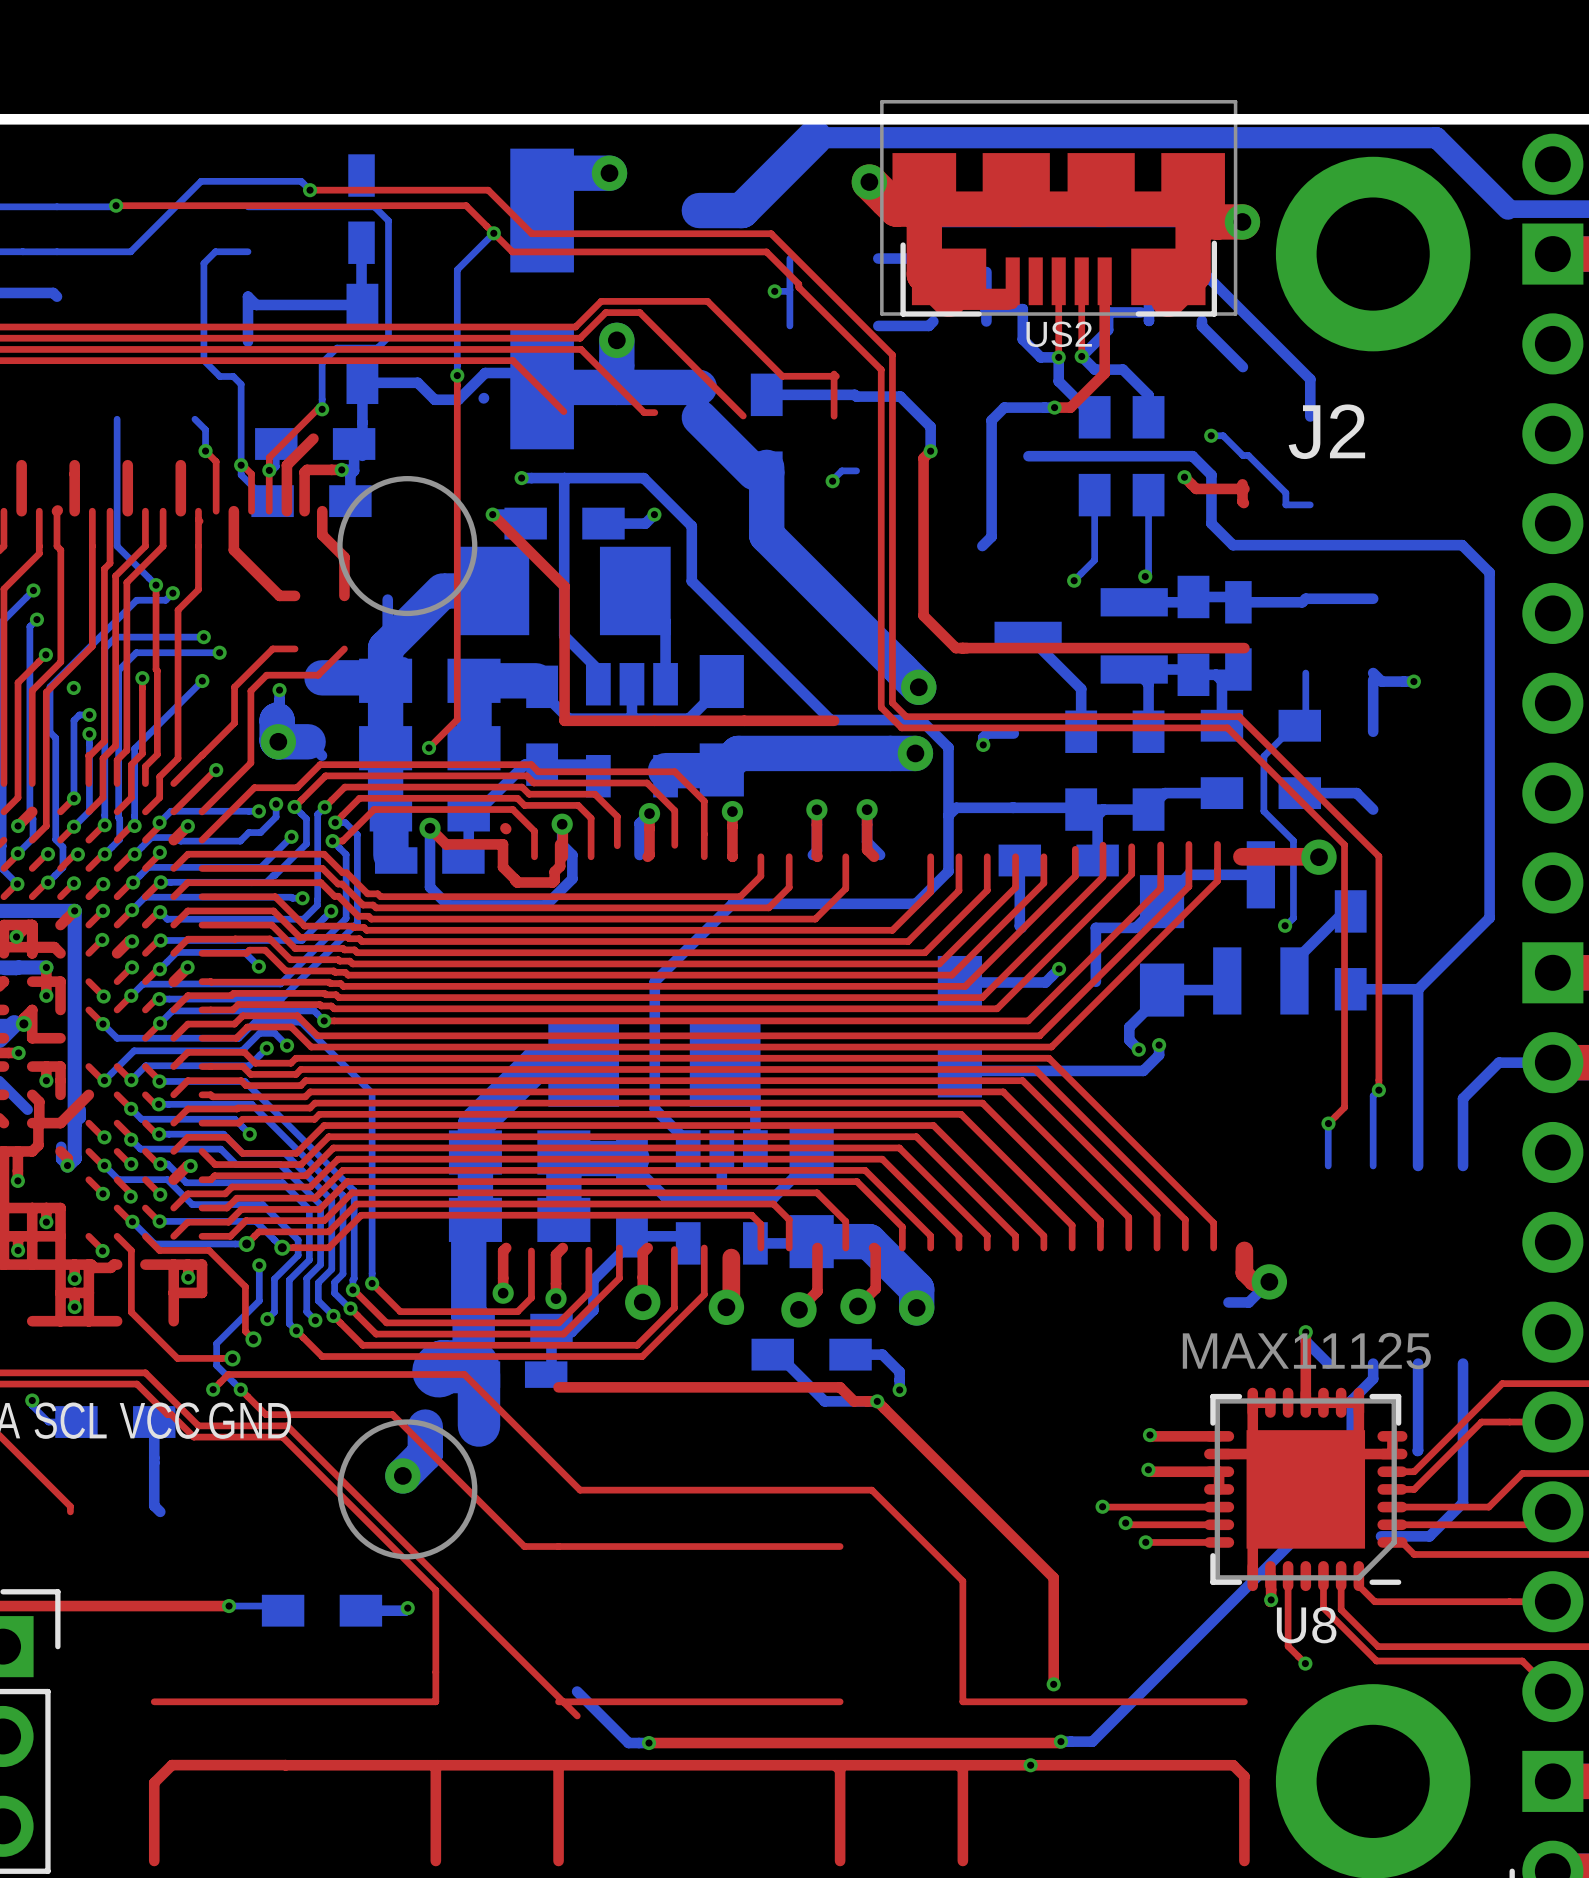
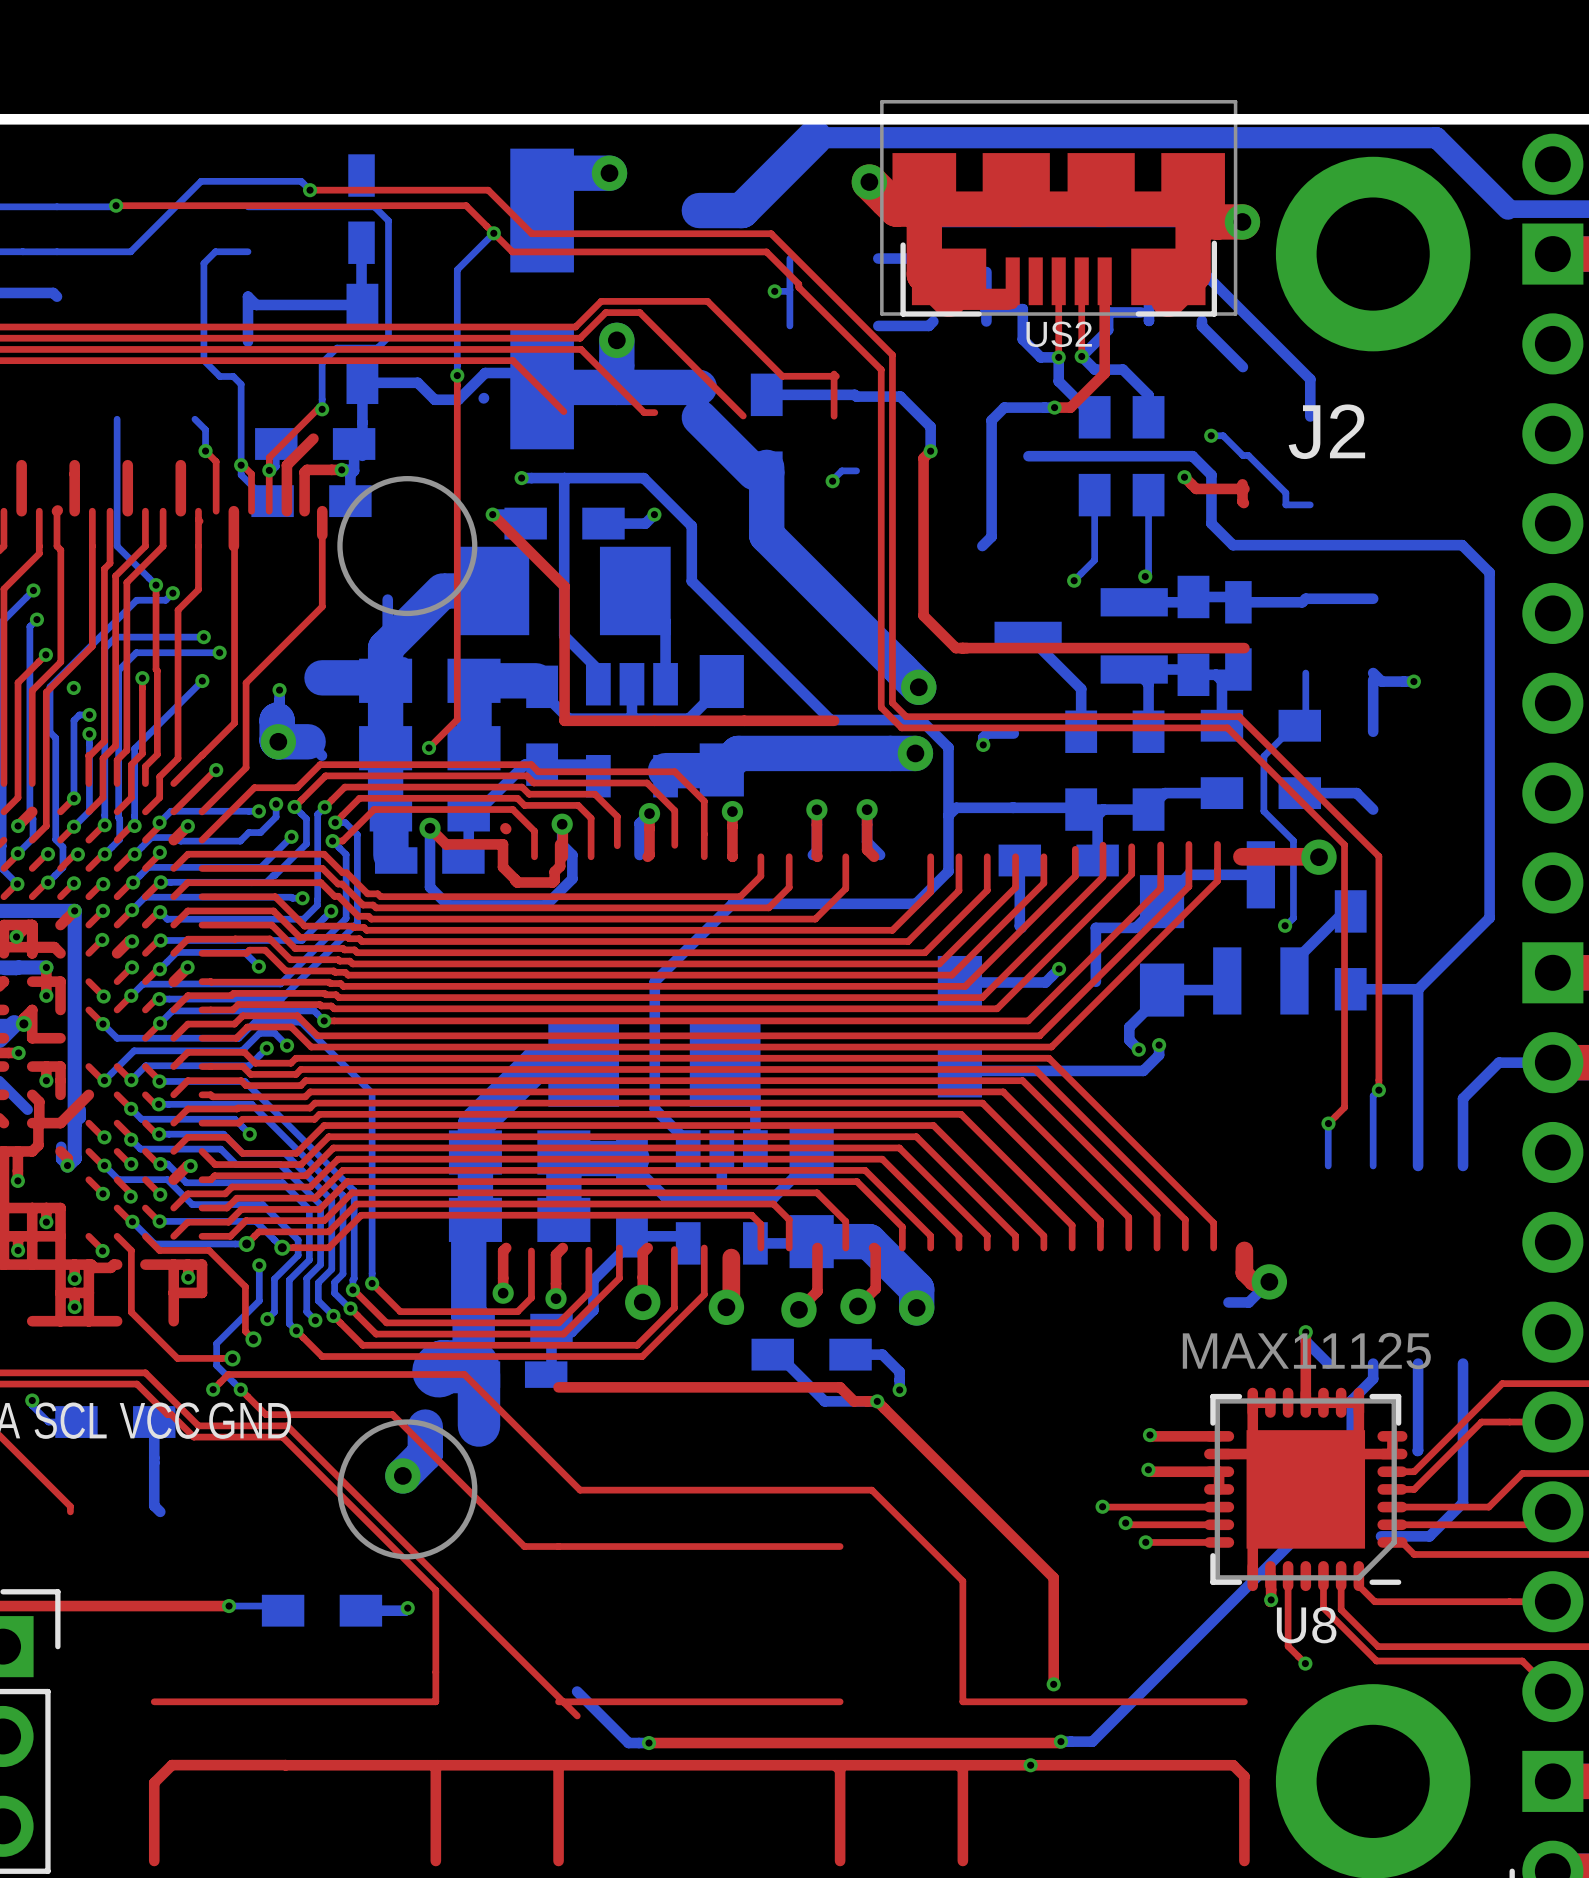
top track: (322, 535) (344, 557) (344, 595) -> none
top track: (233, 546) (233, 550) (279, 595) (295, 595) -> (233, 546) (234, 687)
top track: (295, 648) (272, 648) (234, 687) -> none
top track: (344, 648) (318, 675) (266, 675) (250, 690) (250, 762) (246, 767) -> (322, 535) (322, 606) (246, 682) (246, 767)

